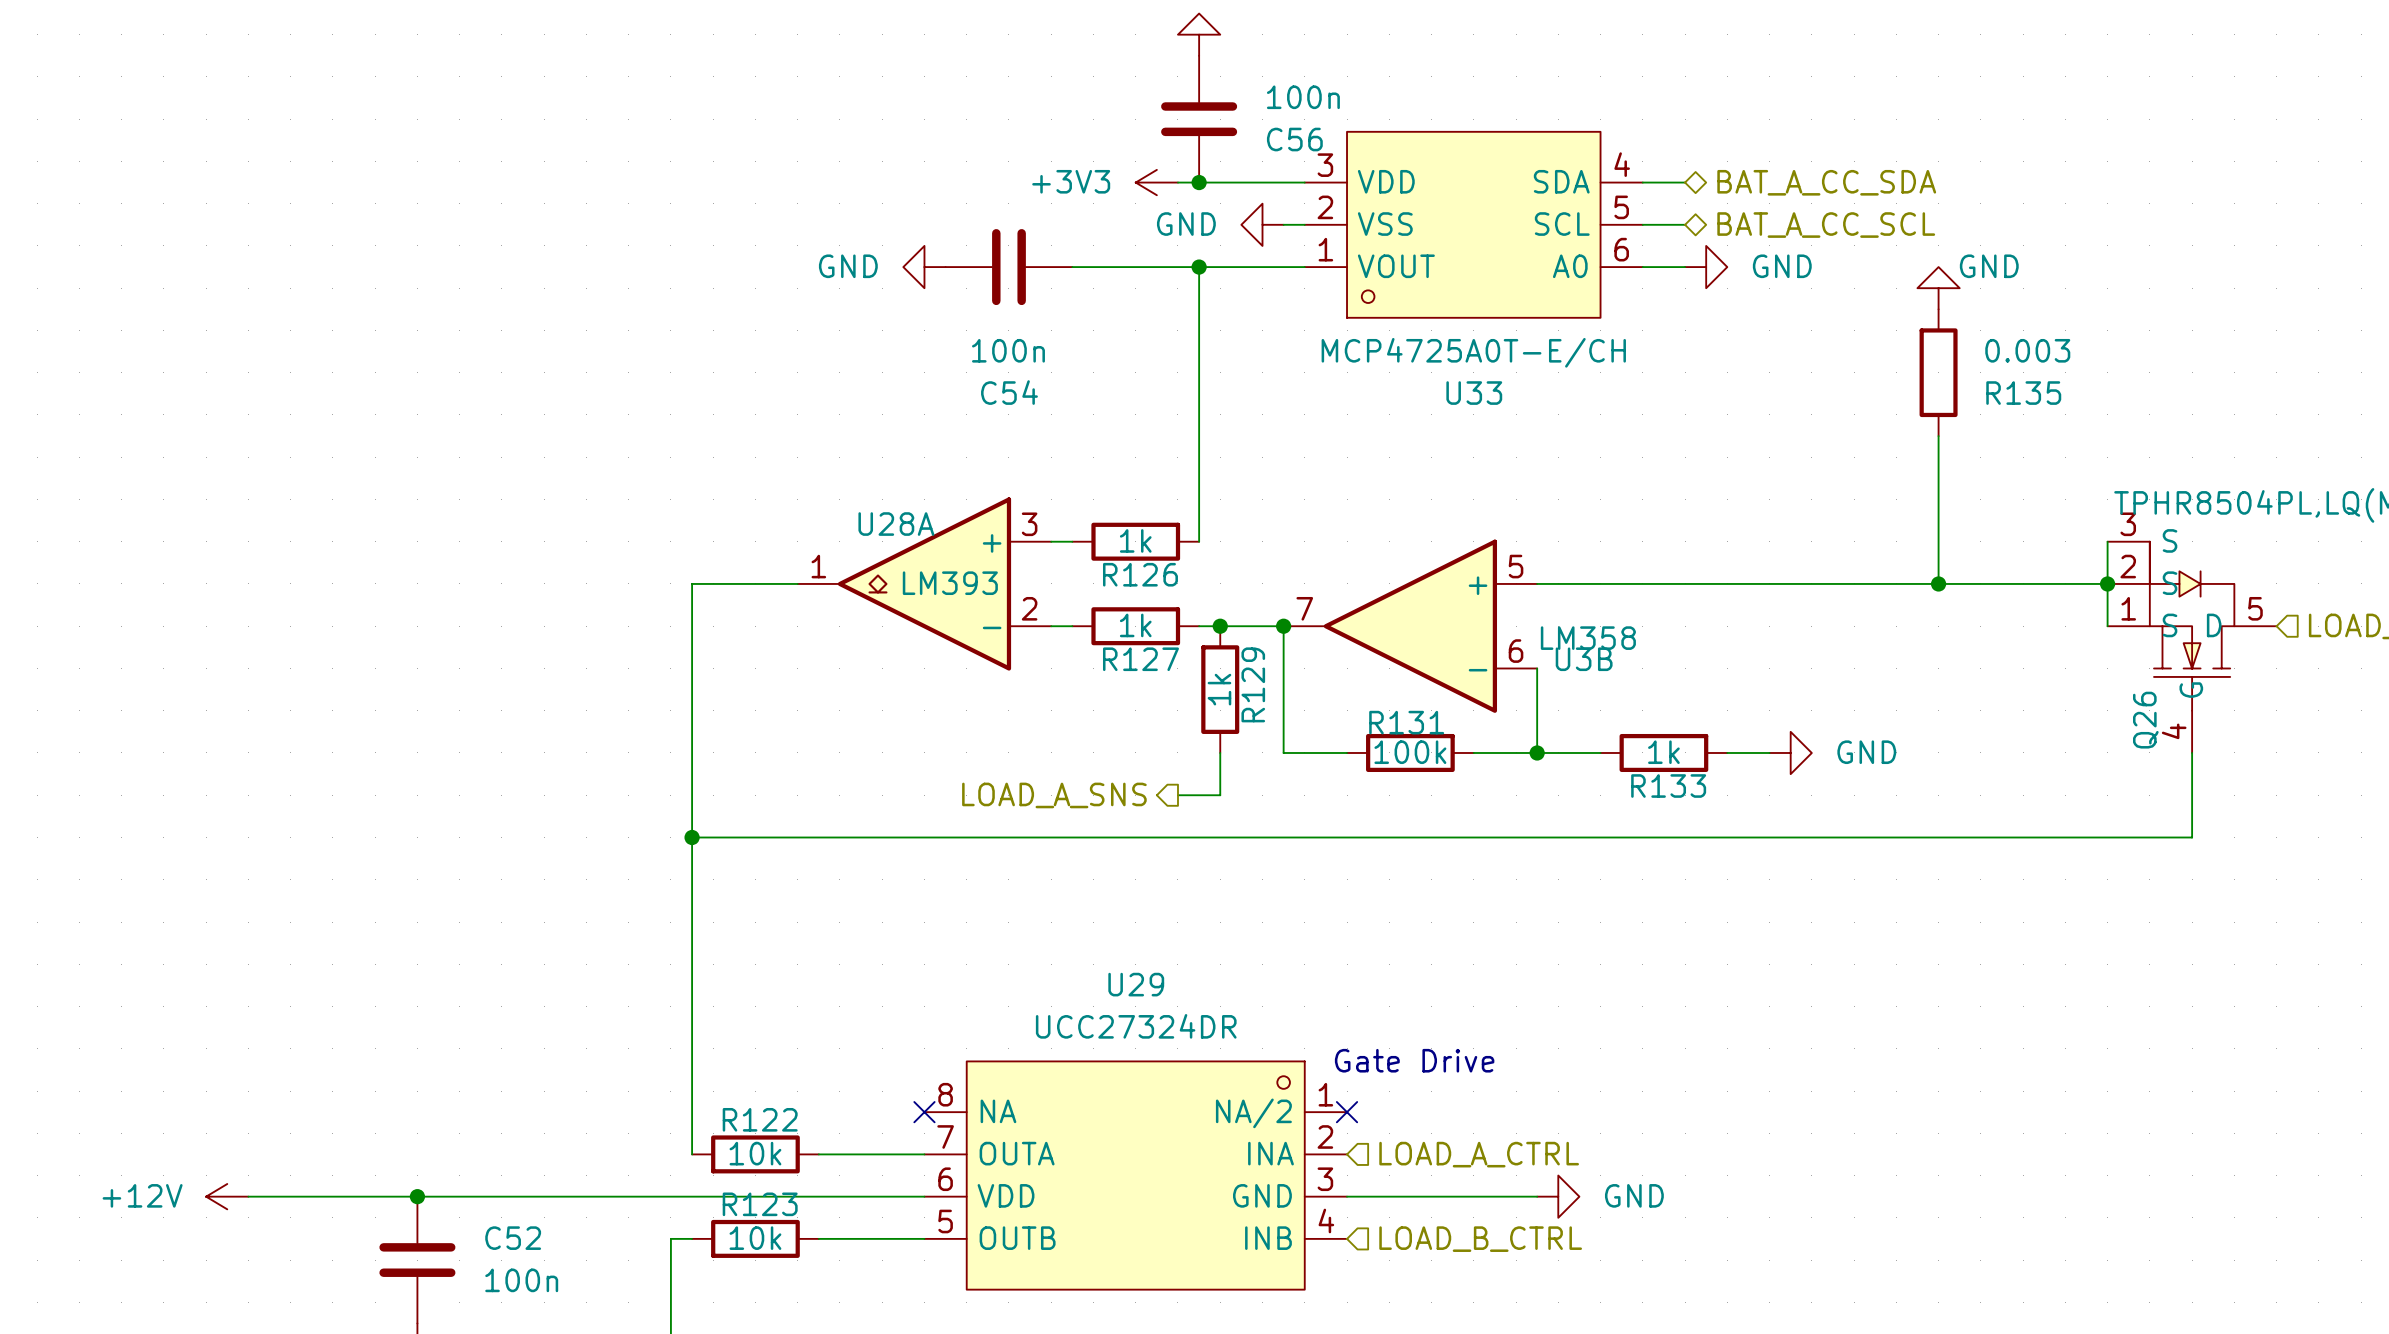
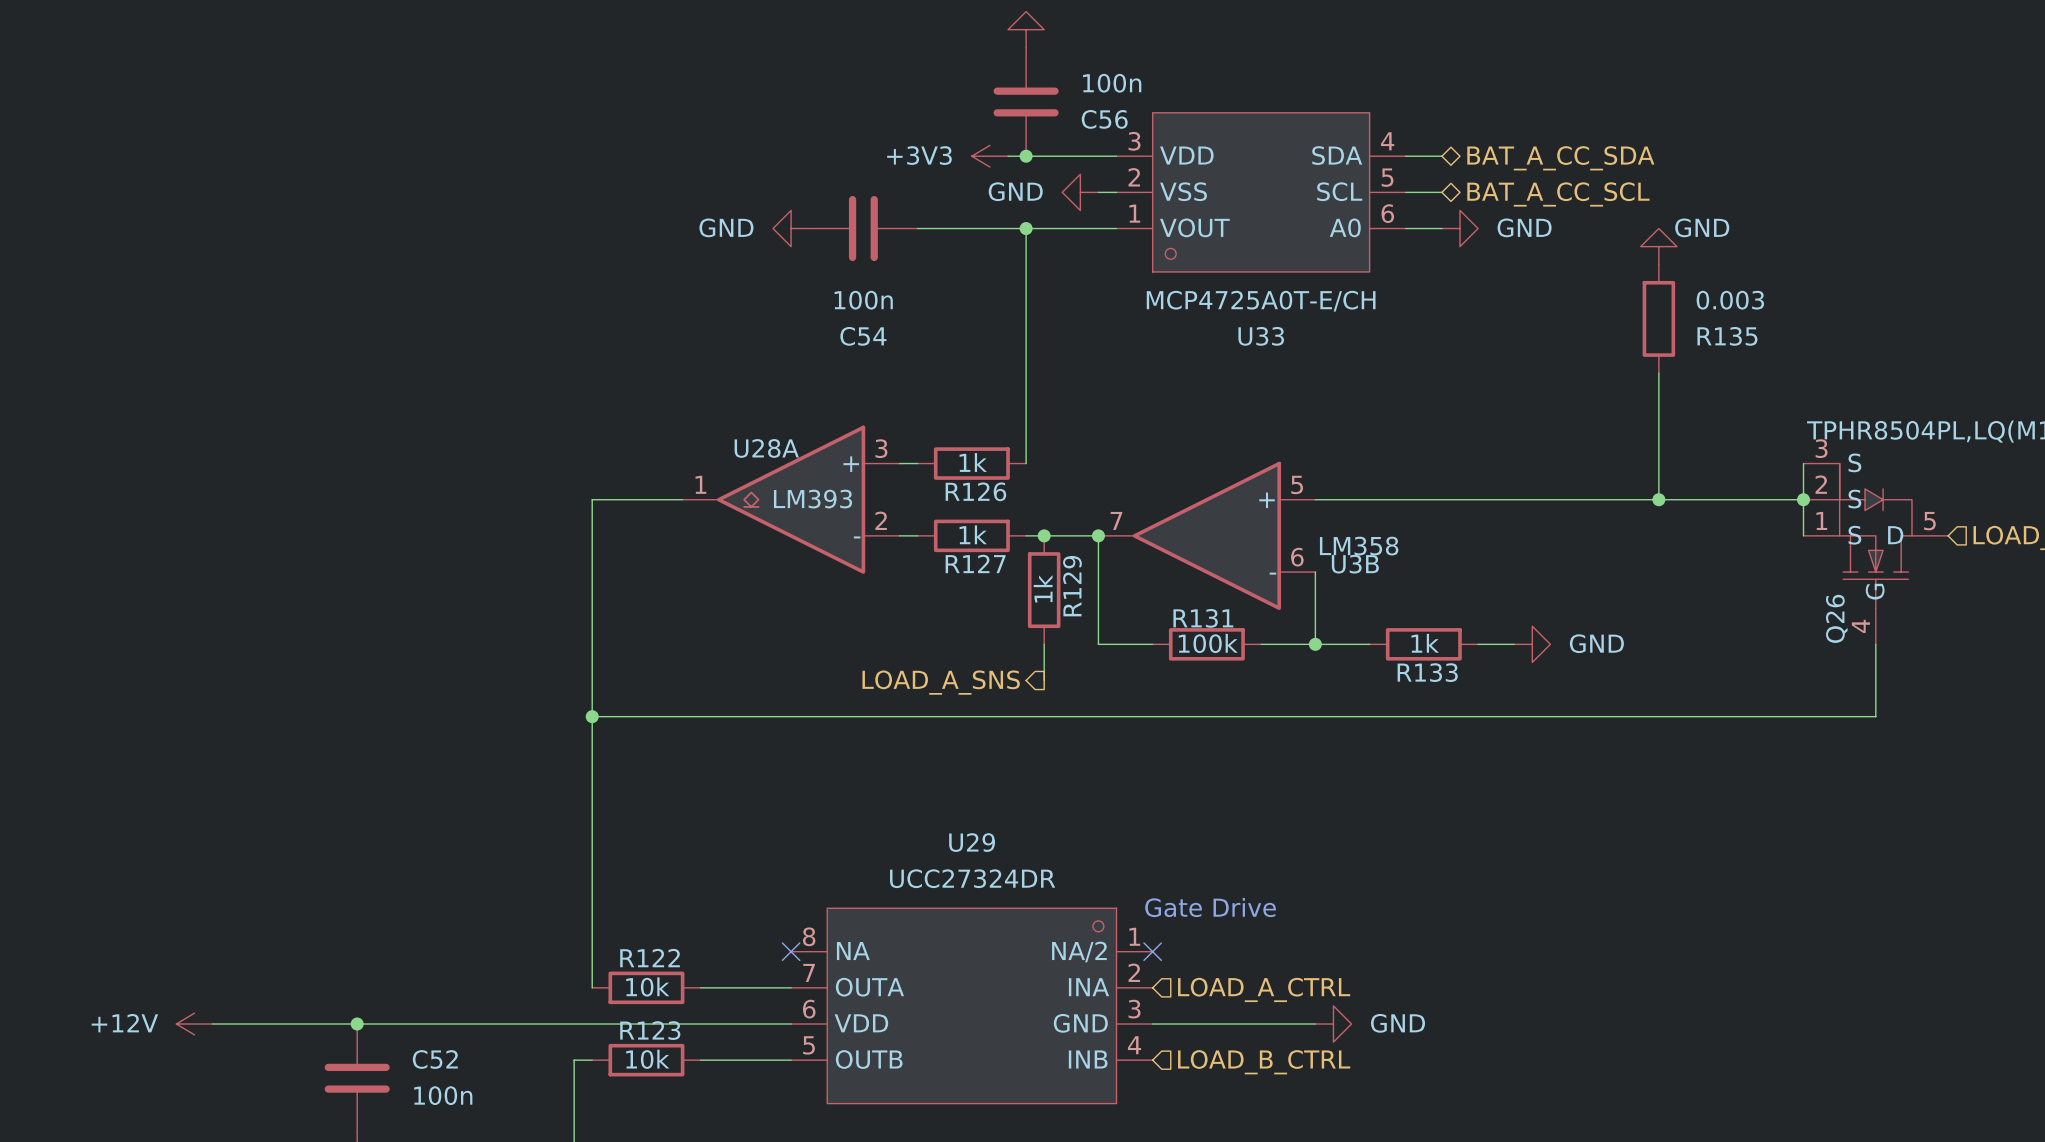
hierarchical label position: LOAD_A_SNS (1054, 795) -> LOAD_A_SNS (941, 682)
wire: (1177, 795) (1220, 795) -> none

